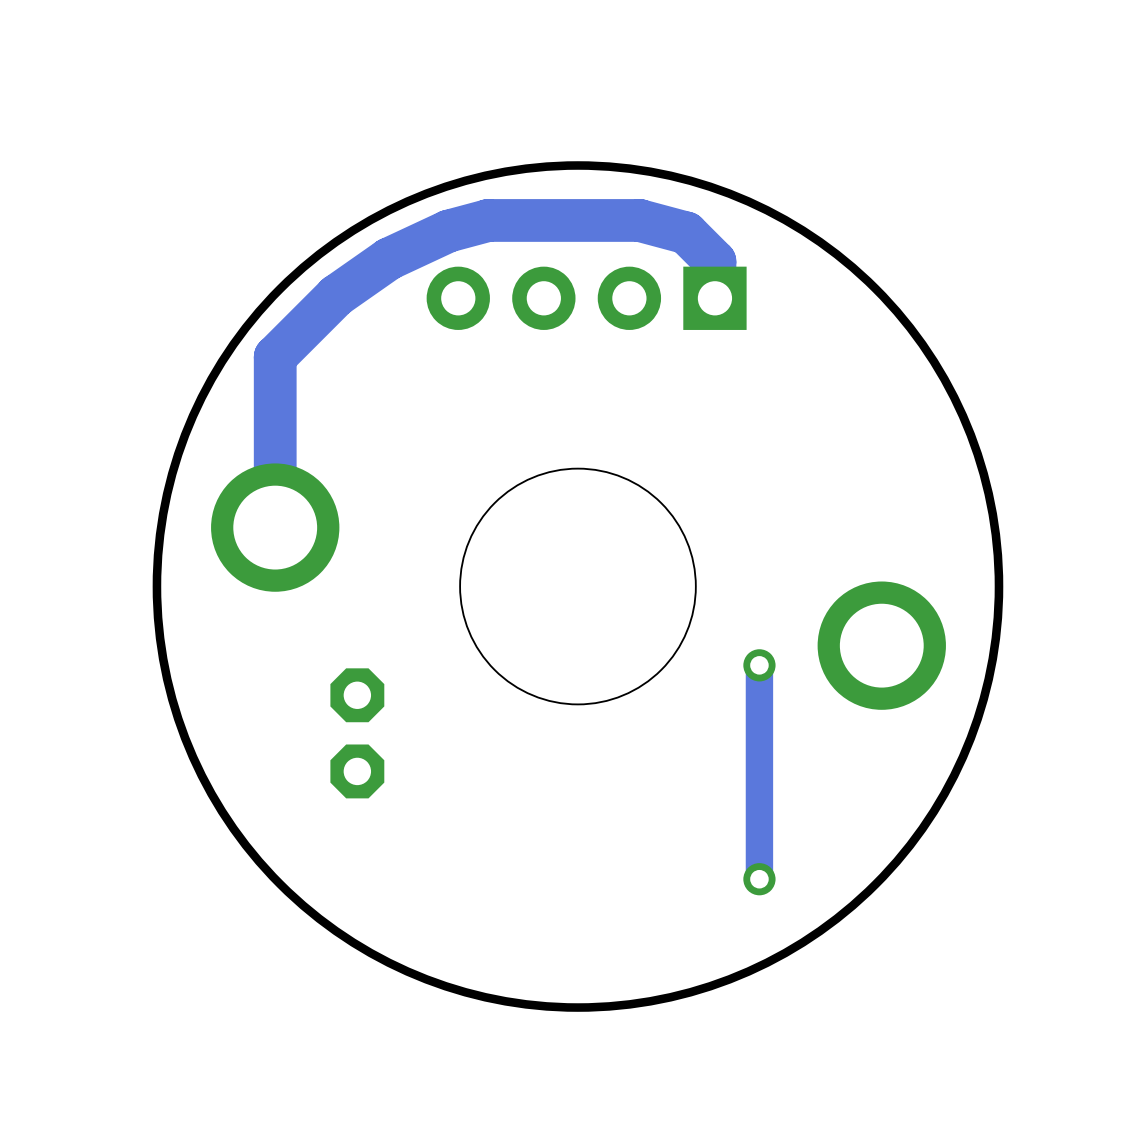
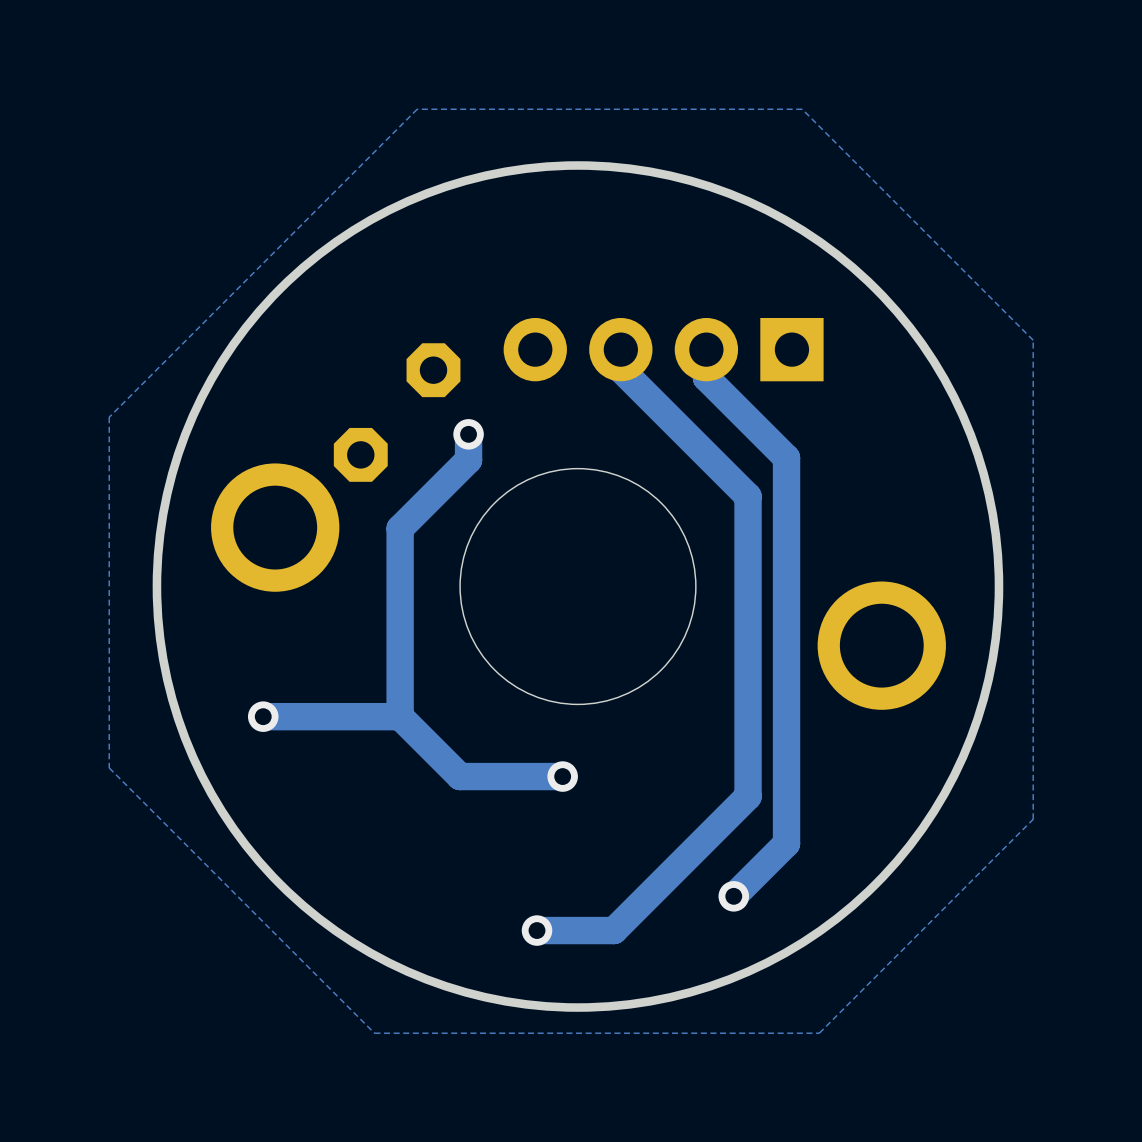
zone outline: none -> (802, 109) (1033, 340) (1033, 819) (819, 1033) (374, 1033) (109, 768) (109, 417) (417, 109) (802, 109)
part position: (586, 298) -> (663, 349)
track: (714, 298) (714, 261) (686, 232) (639, 220) (488, 220) (448, 231) (388, 258) (336, 295) (275, 356) (275, 527) -> none
track: none -> (620, 349) (620, 369) (748, 496) (748, 796) (614, 930) (537, 930)
track: none -> (706, 349) (706, 377) (786, 457) (786, 843) (733, 896)
part: none -> (433, 370)
track: none -> (468, 434) (468, 460) (400, 528) (400, 716)
via: none -> (468, 434)
part: none -> (360, 454)
track: (759, 665) (759, 879) -> none
via: (759, 665) -> none
part: (357, 695) -> none
via: none -> (263, 716)
track: none -> (400, 716) (263, 716)
track: none -> (400, 716) (460, 776) (562, 776)
part: (357, 771) -> none
via: none -> (562, 776)
via position: (759, 879) -> (733, 896)
via: none -> (537, 930)

